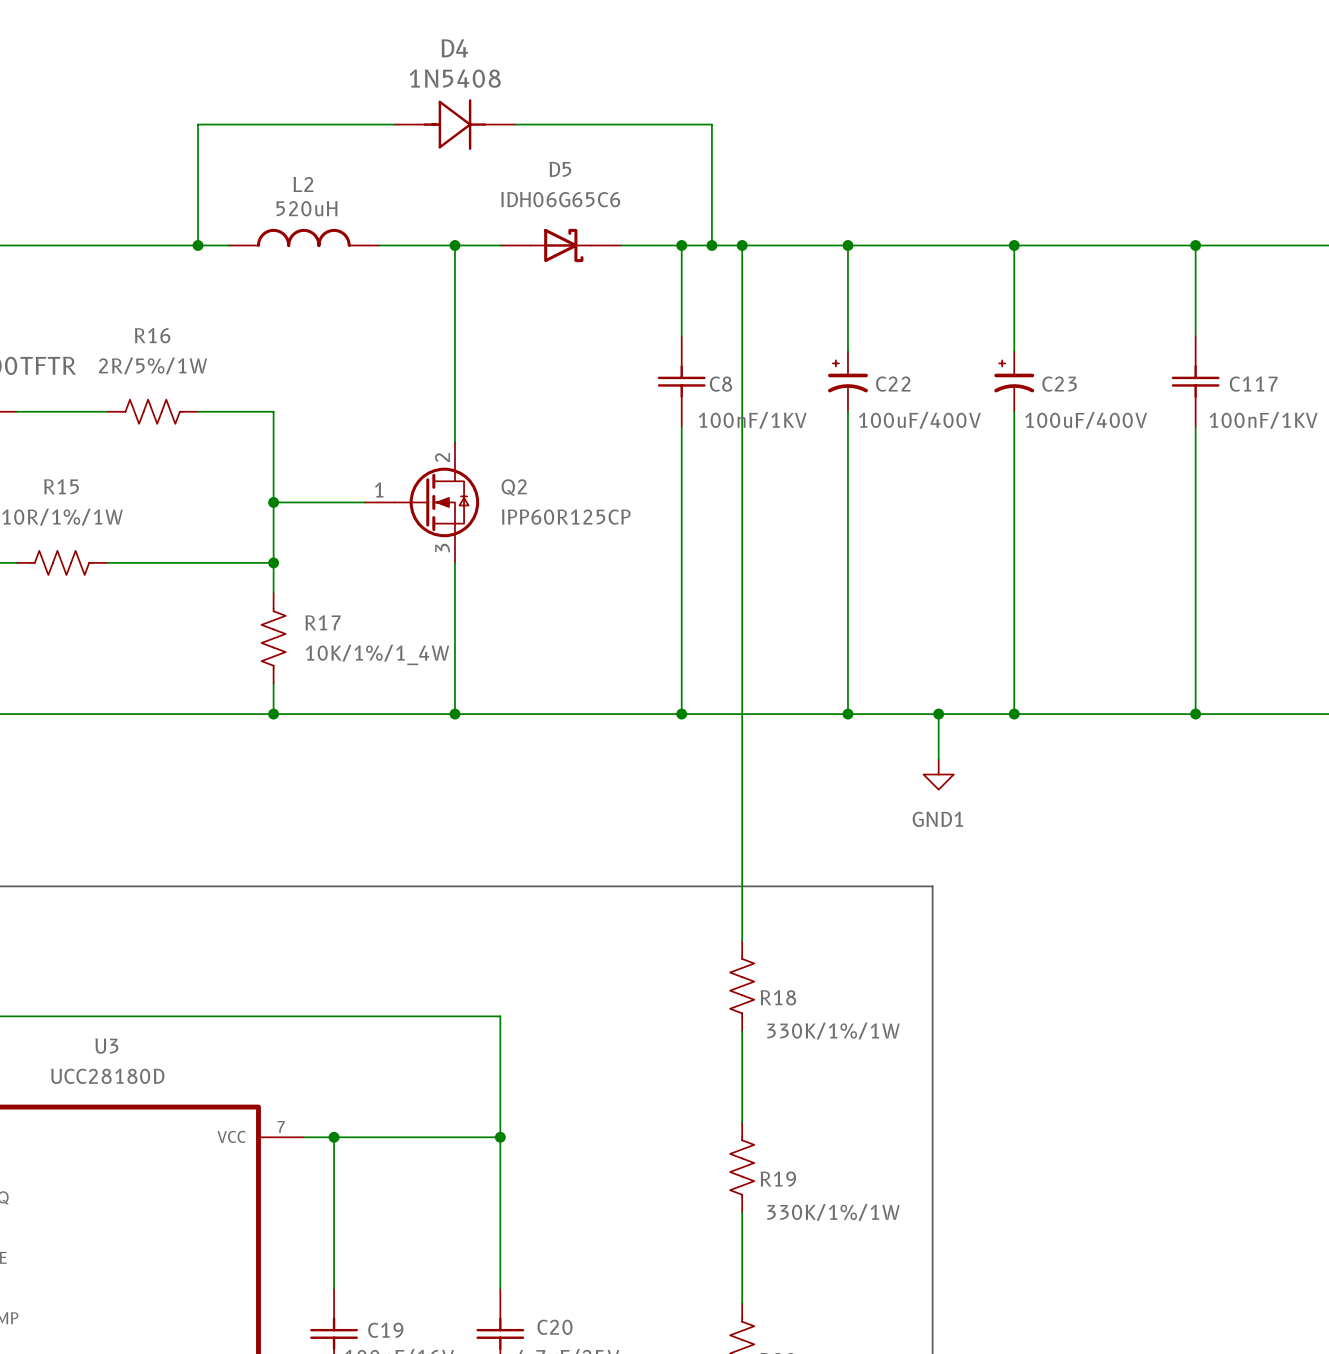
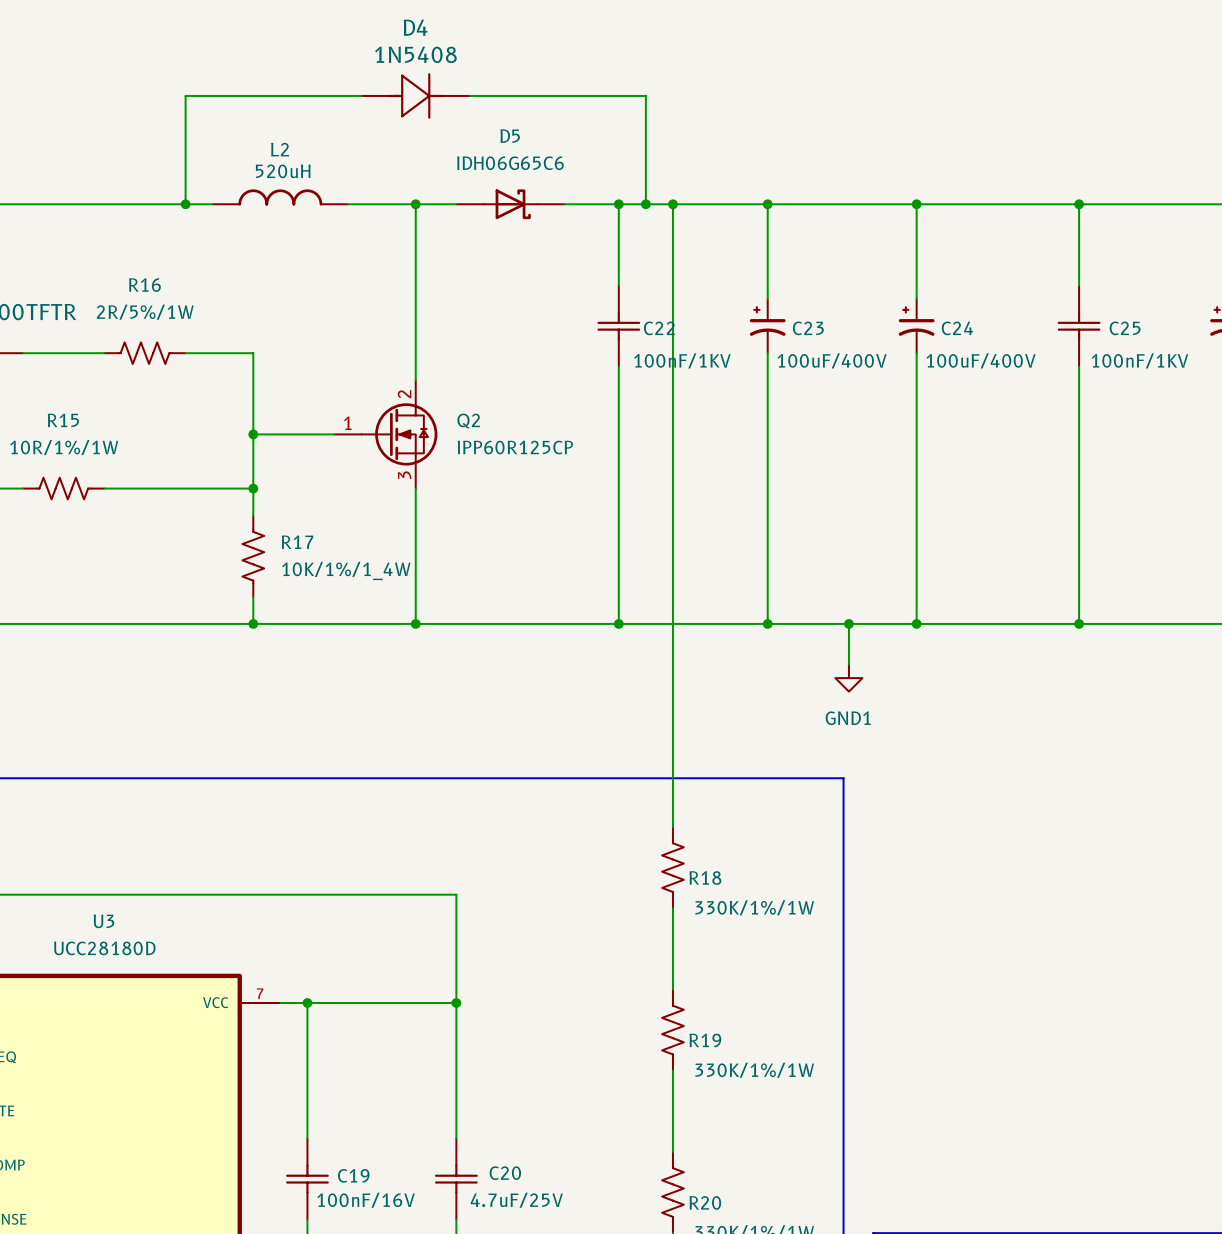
C8 name: C8 (720, 384) -> C22 (659, 328)
C22 name: C22 (893, 384) -> C23 (808, 328)
C23 name: C23 (1059, 384) -> C24 (957, 328)
C117 name: C117 (1253, 384) -> C25 (1125, 328)

